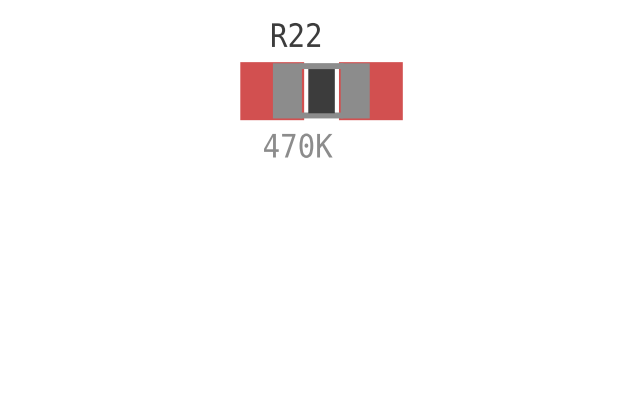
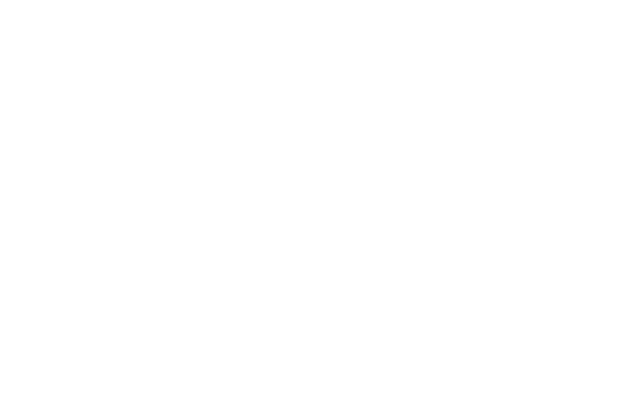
R22: 470K (321, 91) -> none

